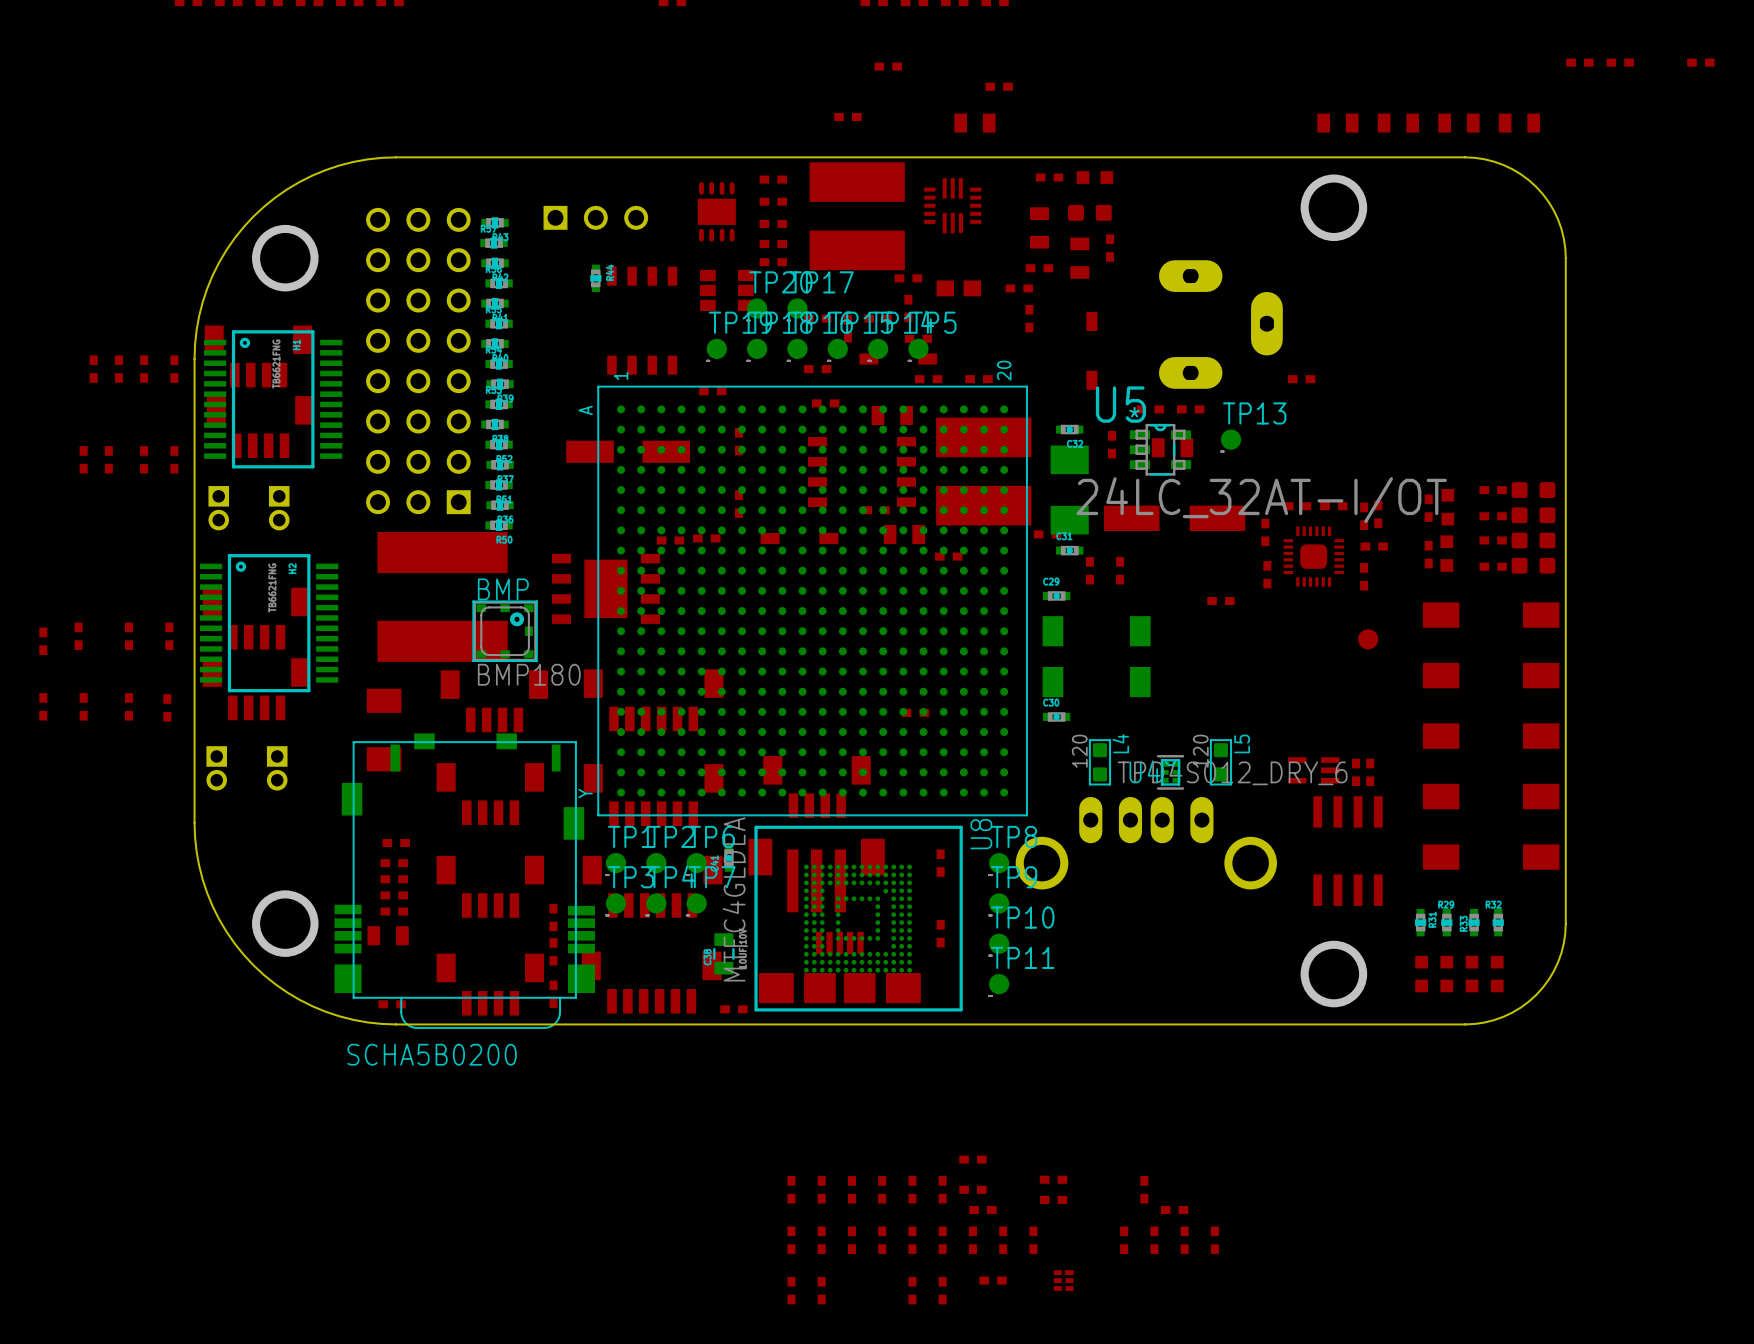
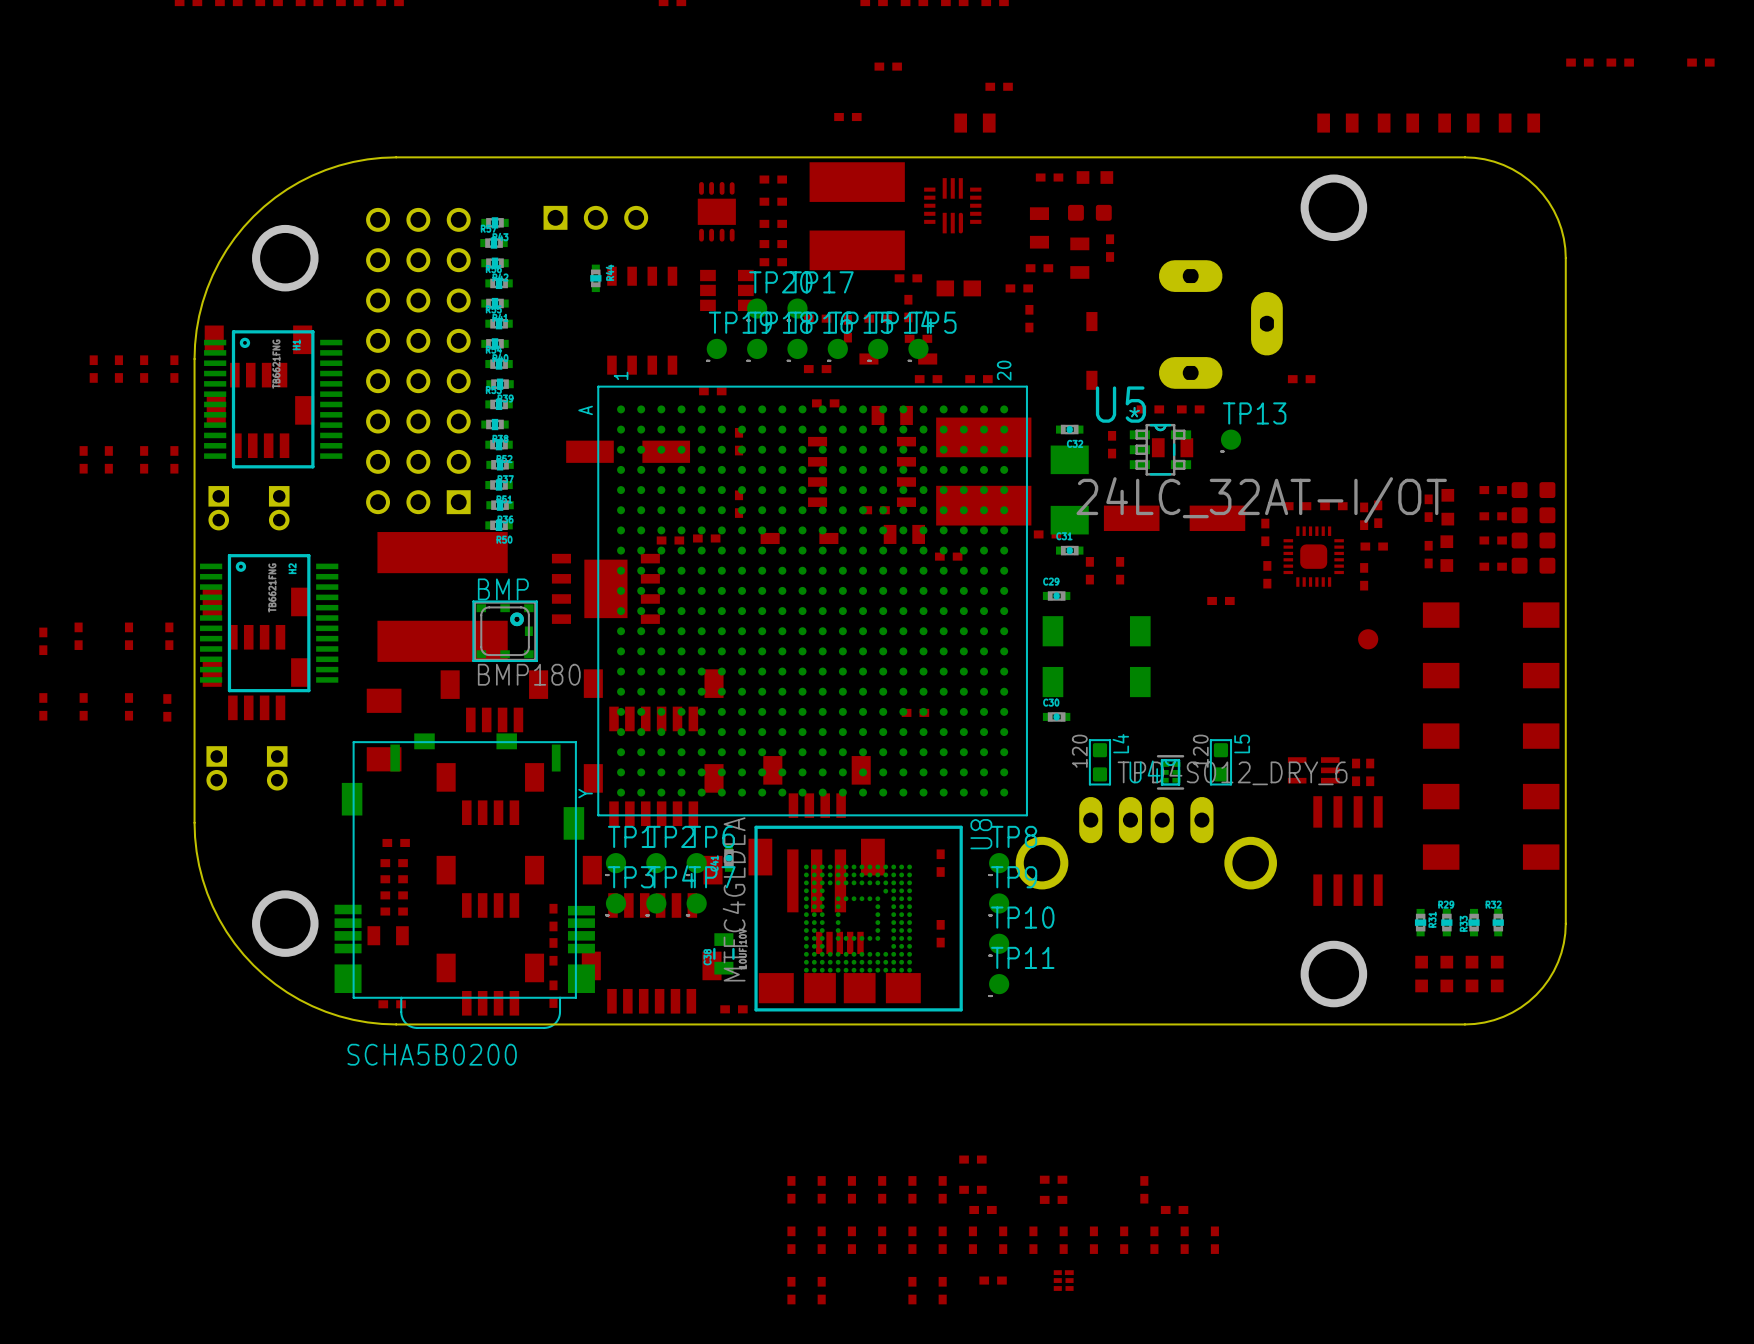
part: none -> (1063, 1240)
part: none -> (1093, 1240)

